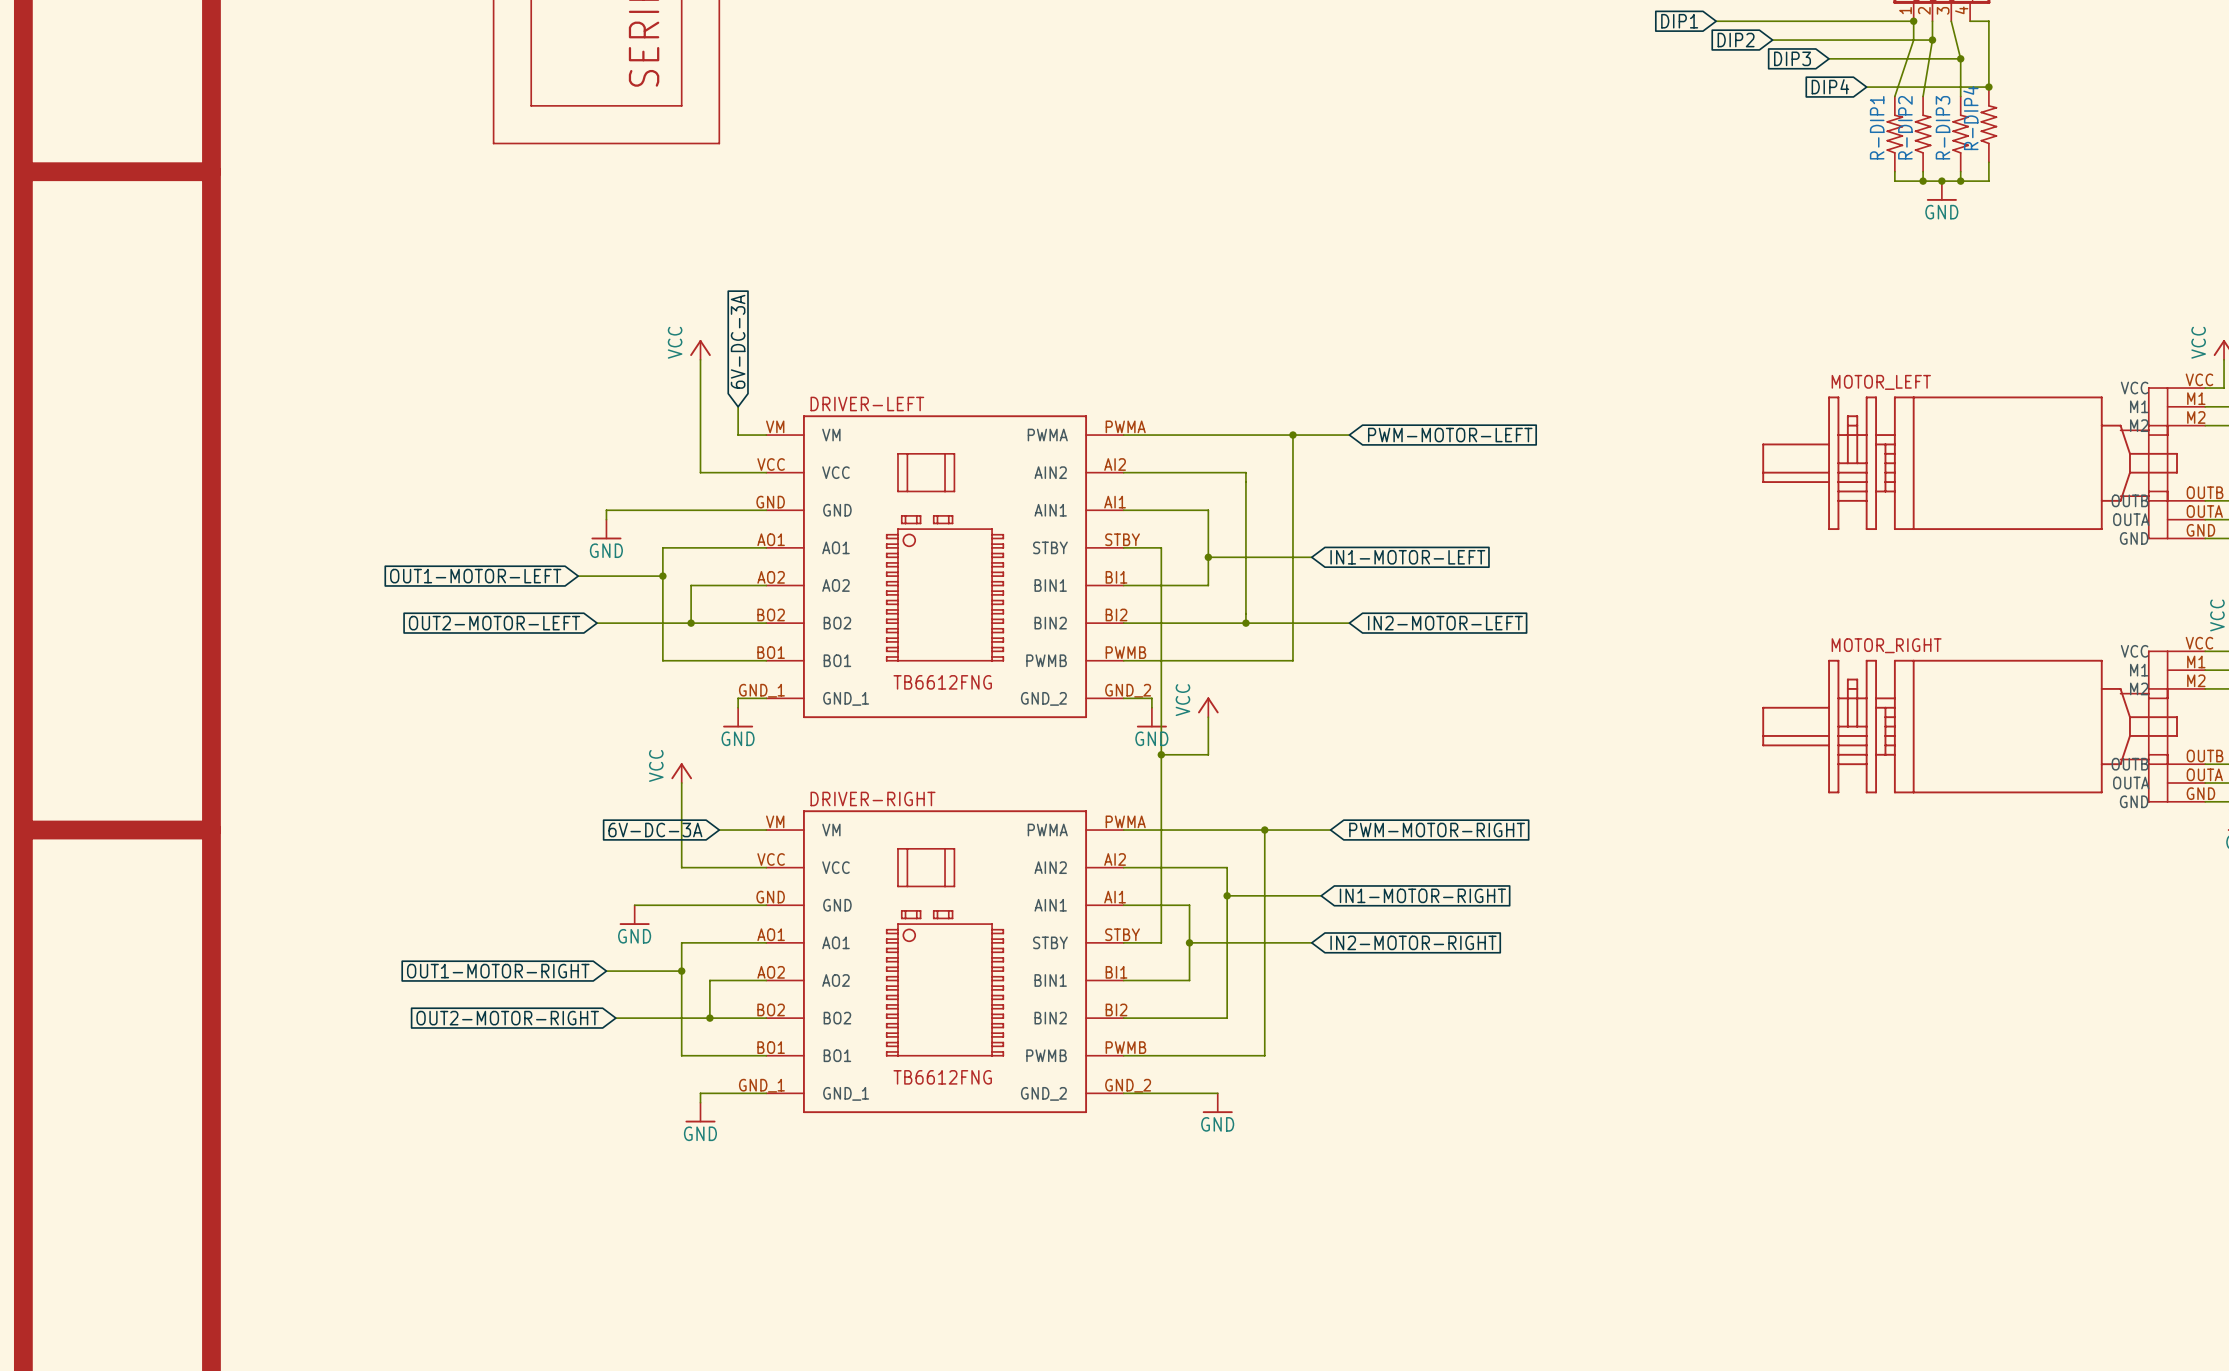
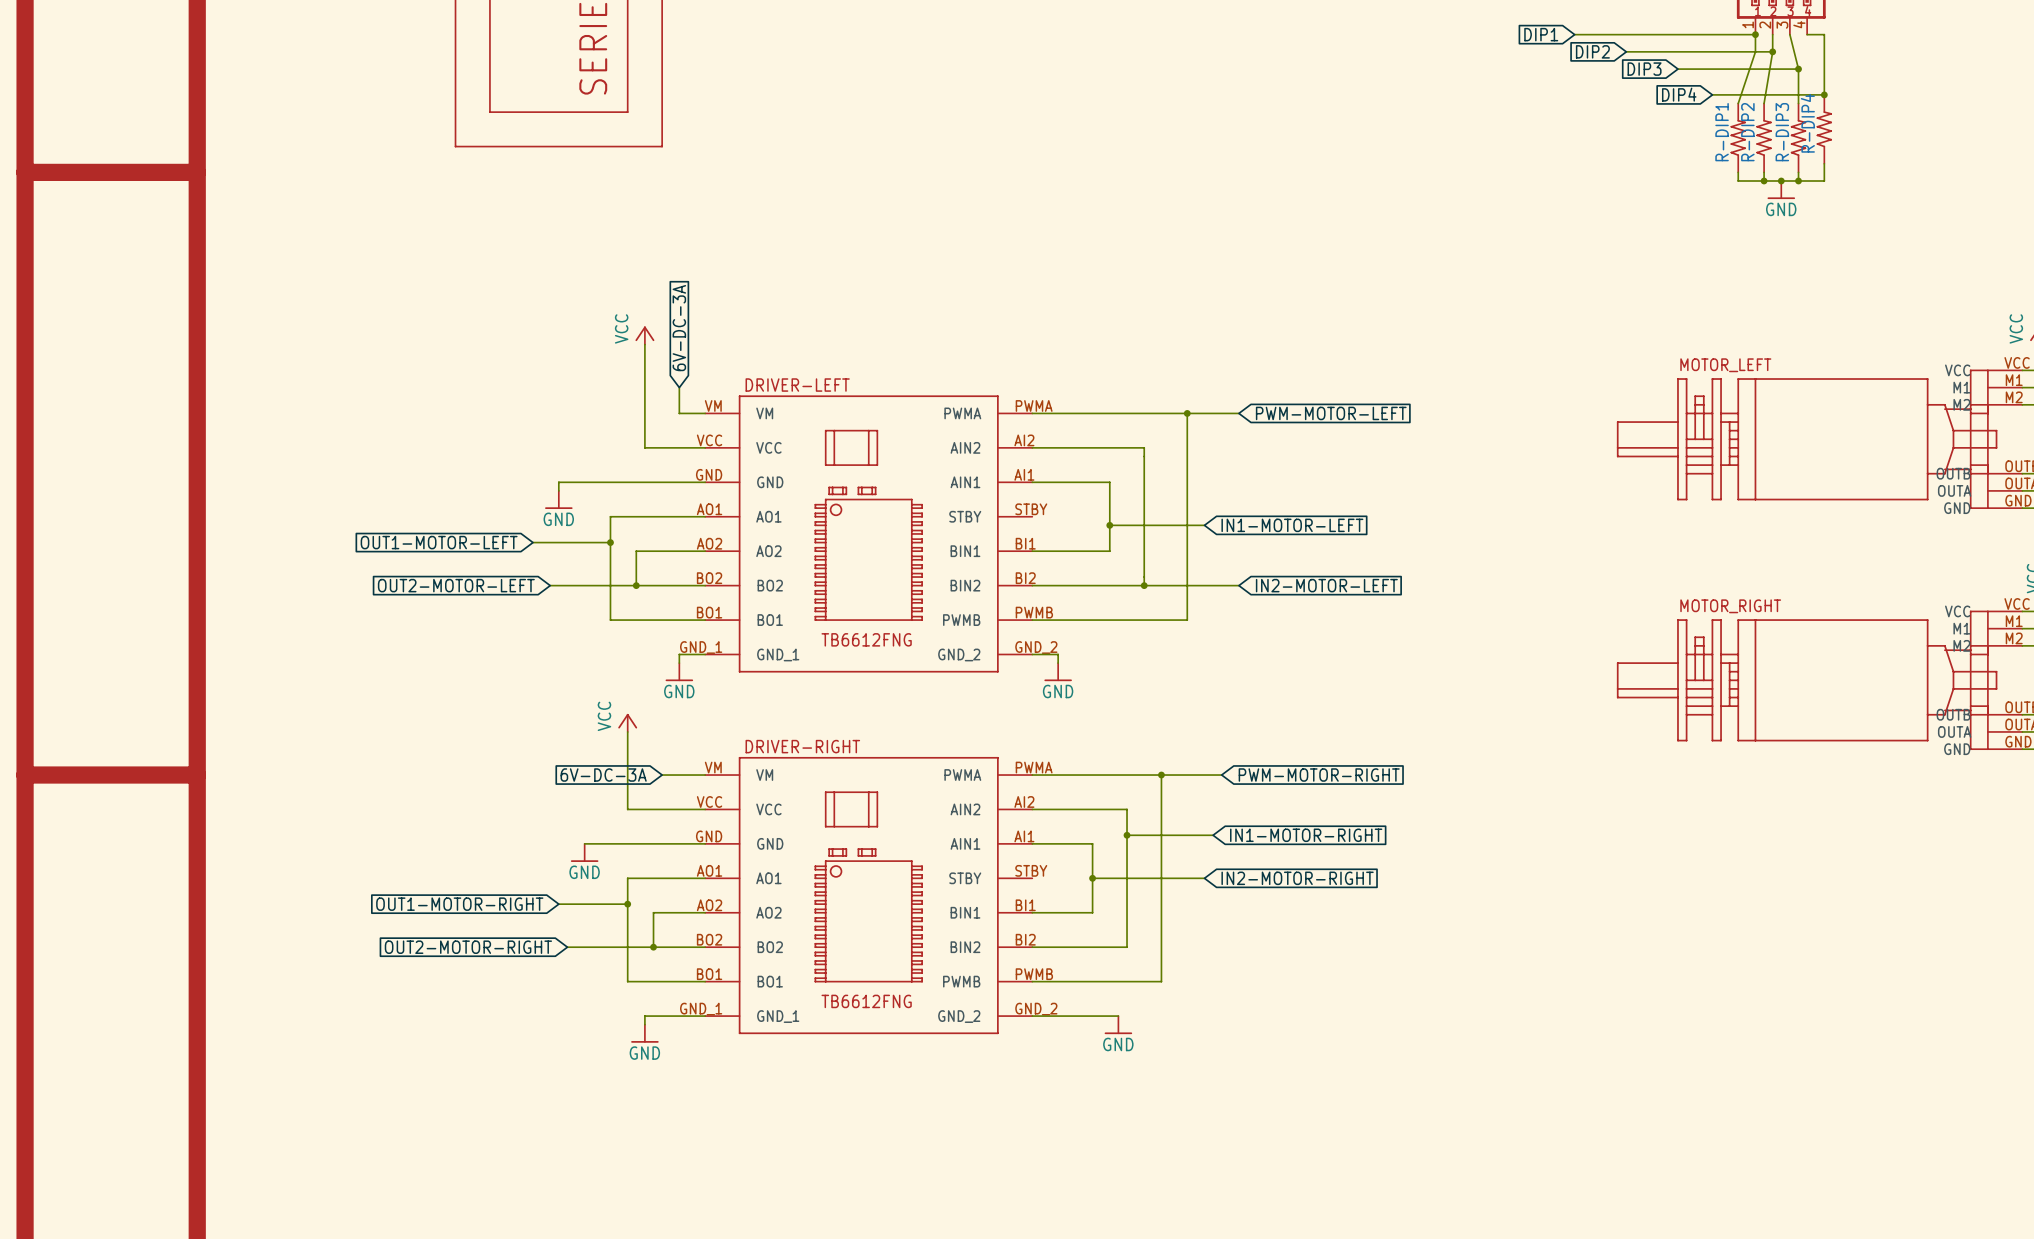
wire: (1123, 547) (1161, 547) (1161, 942) (1123, 942) -> none
power symbol: VCC (1208, 707) -> none
wire: (1208, 717) (1208, 754) (1161, 754) -> none
junction: (1161, 754) -> none

